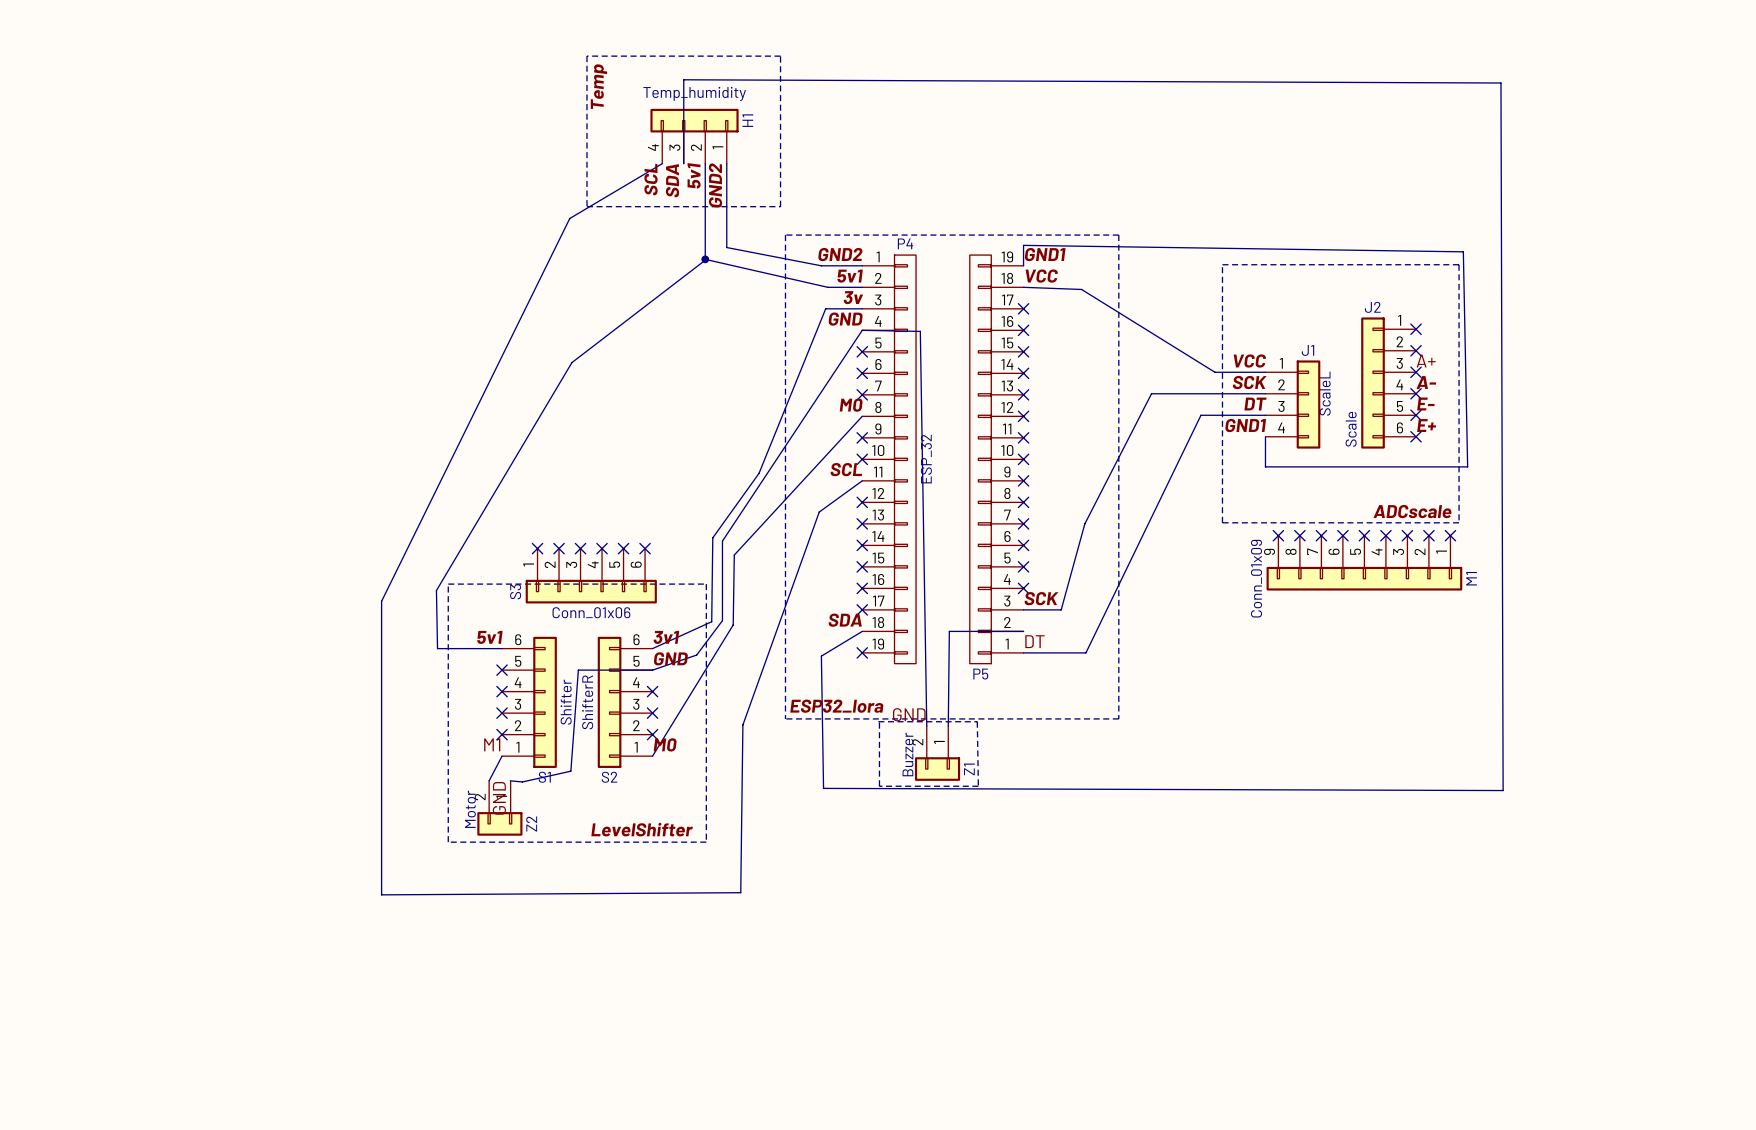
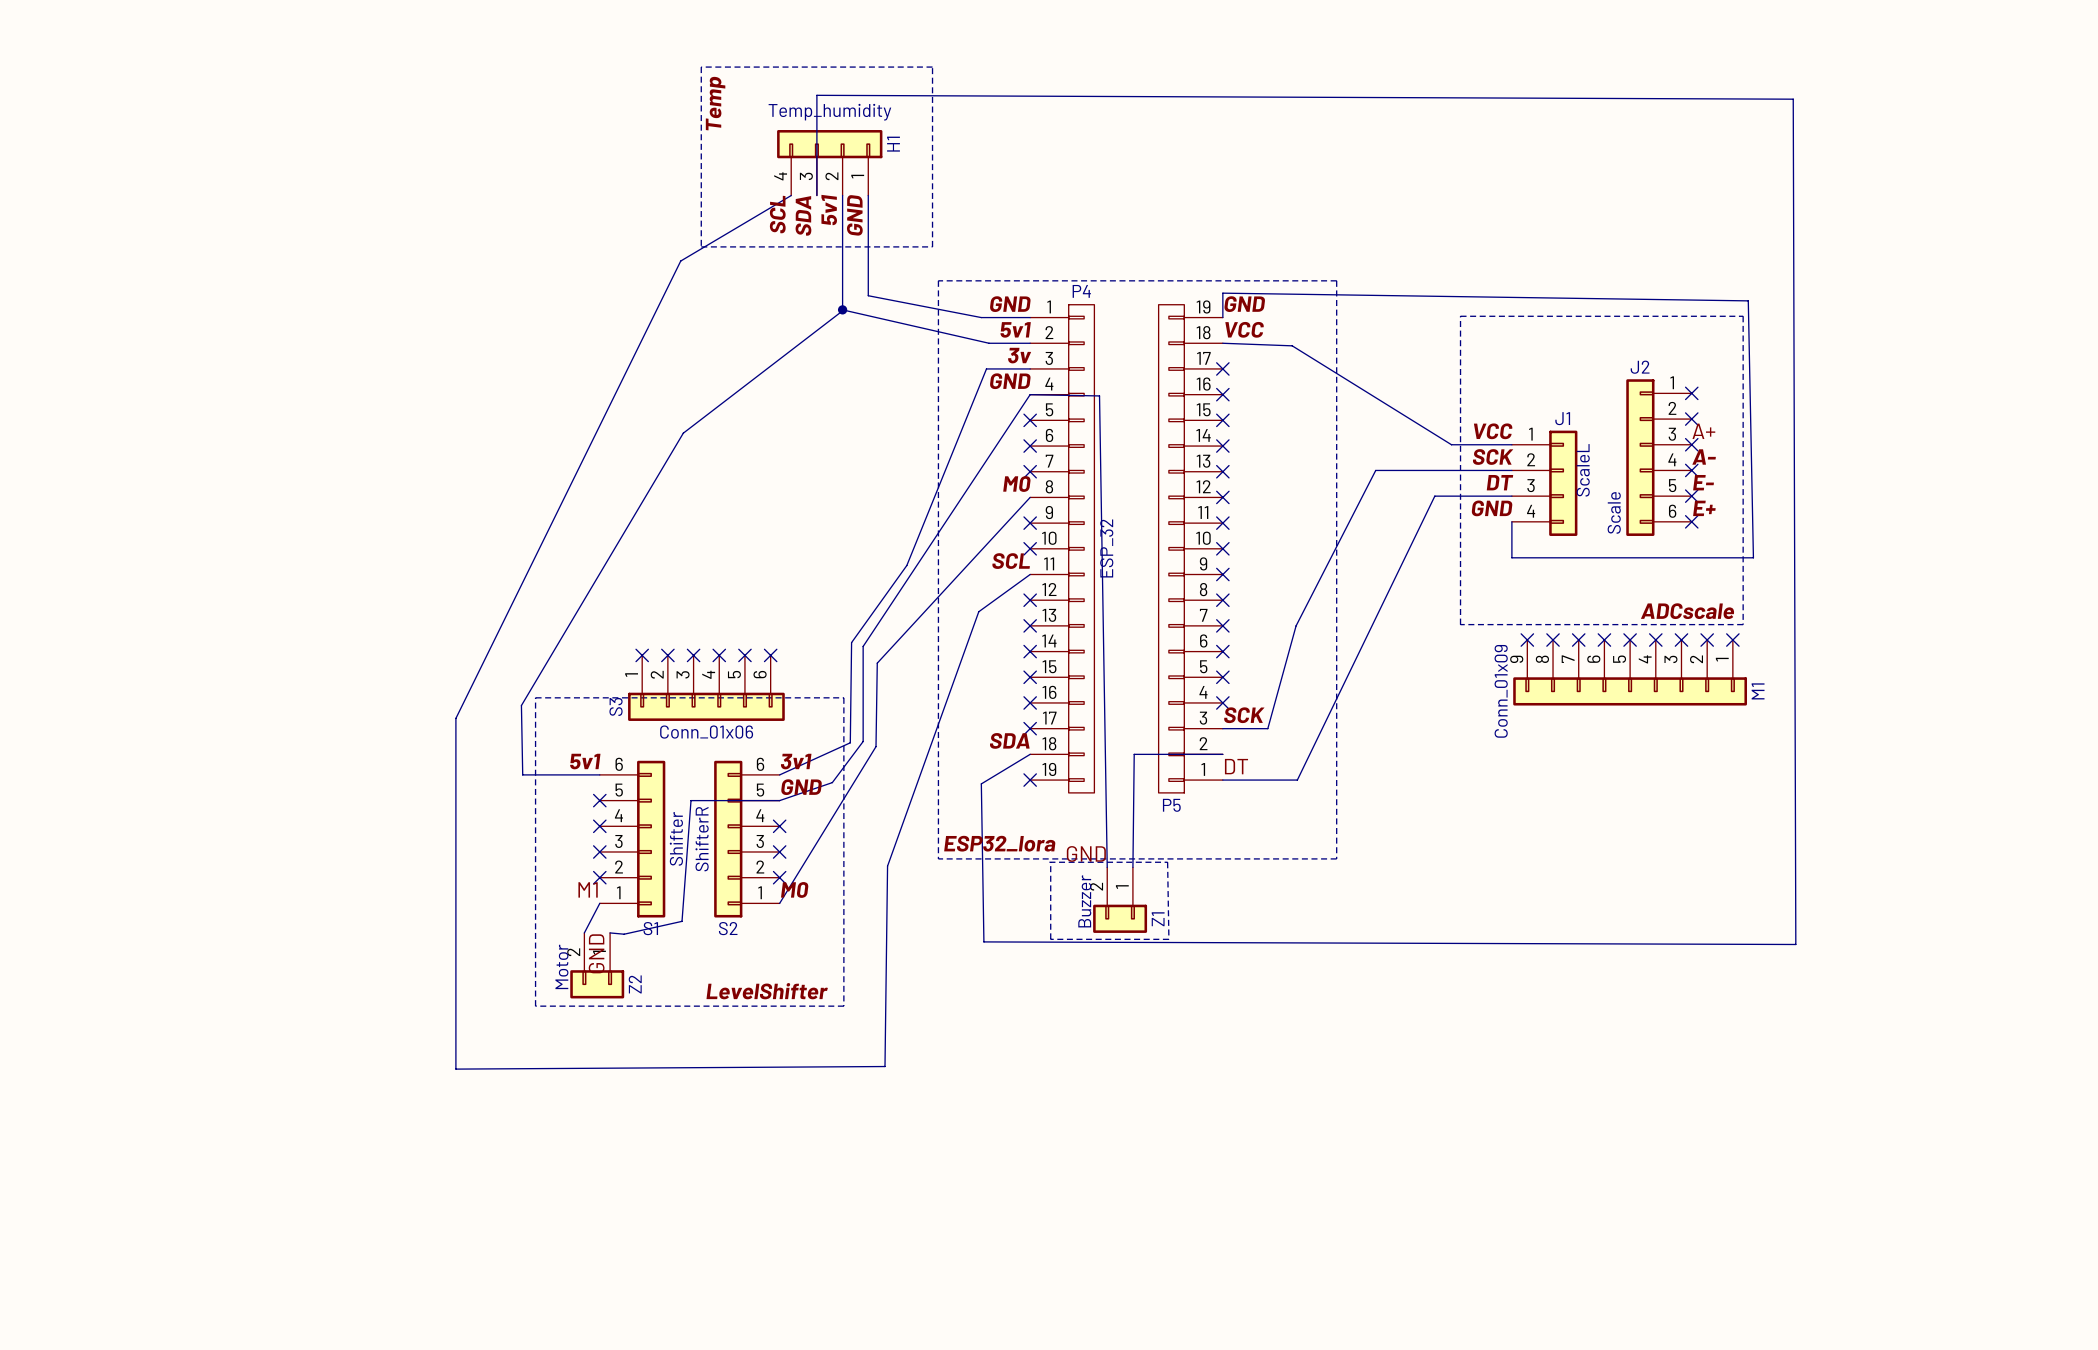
label: GND2 (715, 185) -> GND (854, 215)
label: GND2 (840, 254) -> GND (1010, 304)
label: GND1 (1045, 254) -> GND (1244, 304)
label: GND1 (1245, 425) -> GND (1492, 508)

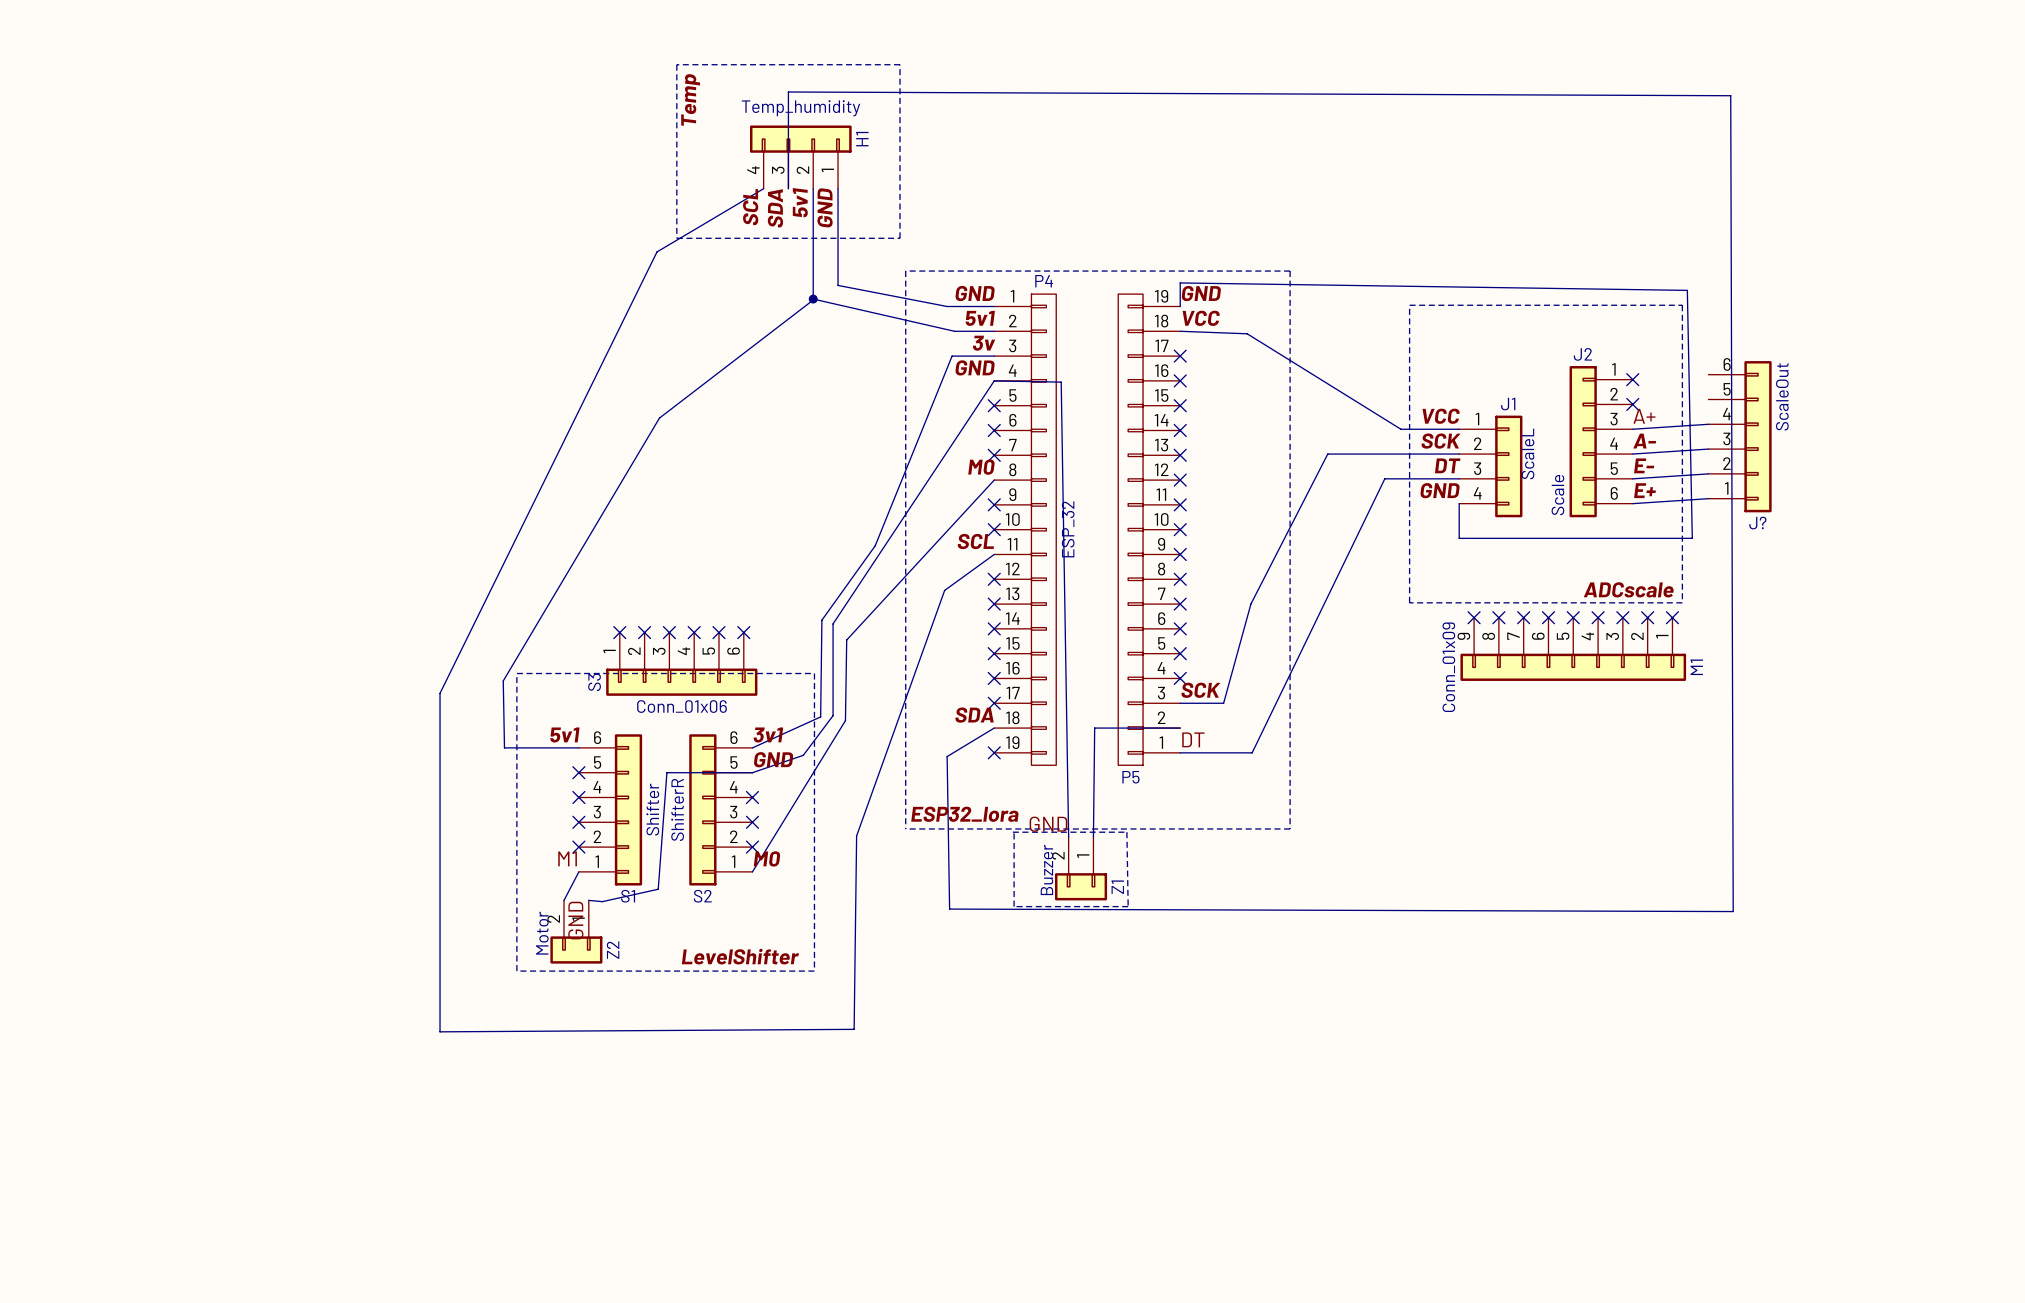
wire: none -> (1708, 424) (1632, 429)
no-connect mark: (1691, 444) -> none
J?: none -> ScaleOut (1740, 436)
wire: none -> (1708, 449) (1632, 454)
no-connect mark: (1691, 470) -> none
wire: none -> (1708, 473) (1632, 478)
no-connect mark: (1691, 496) -> none
wire: none -> (1708, 498) (1632, 503)
no-connect mark: (1691, 521) -> none

